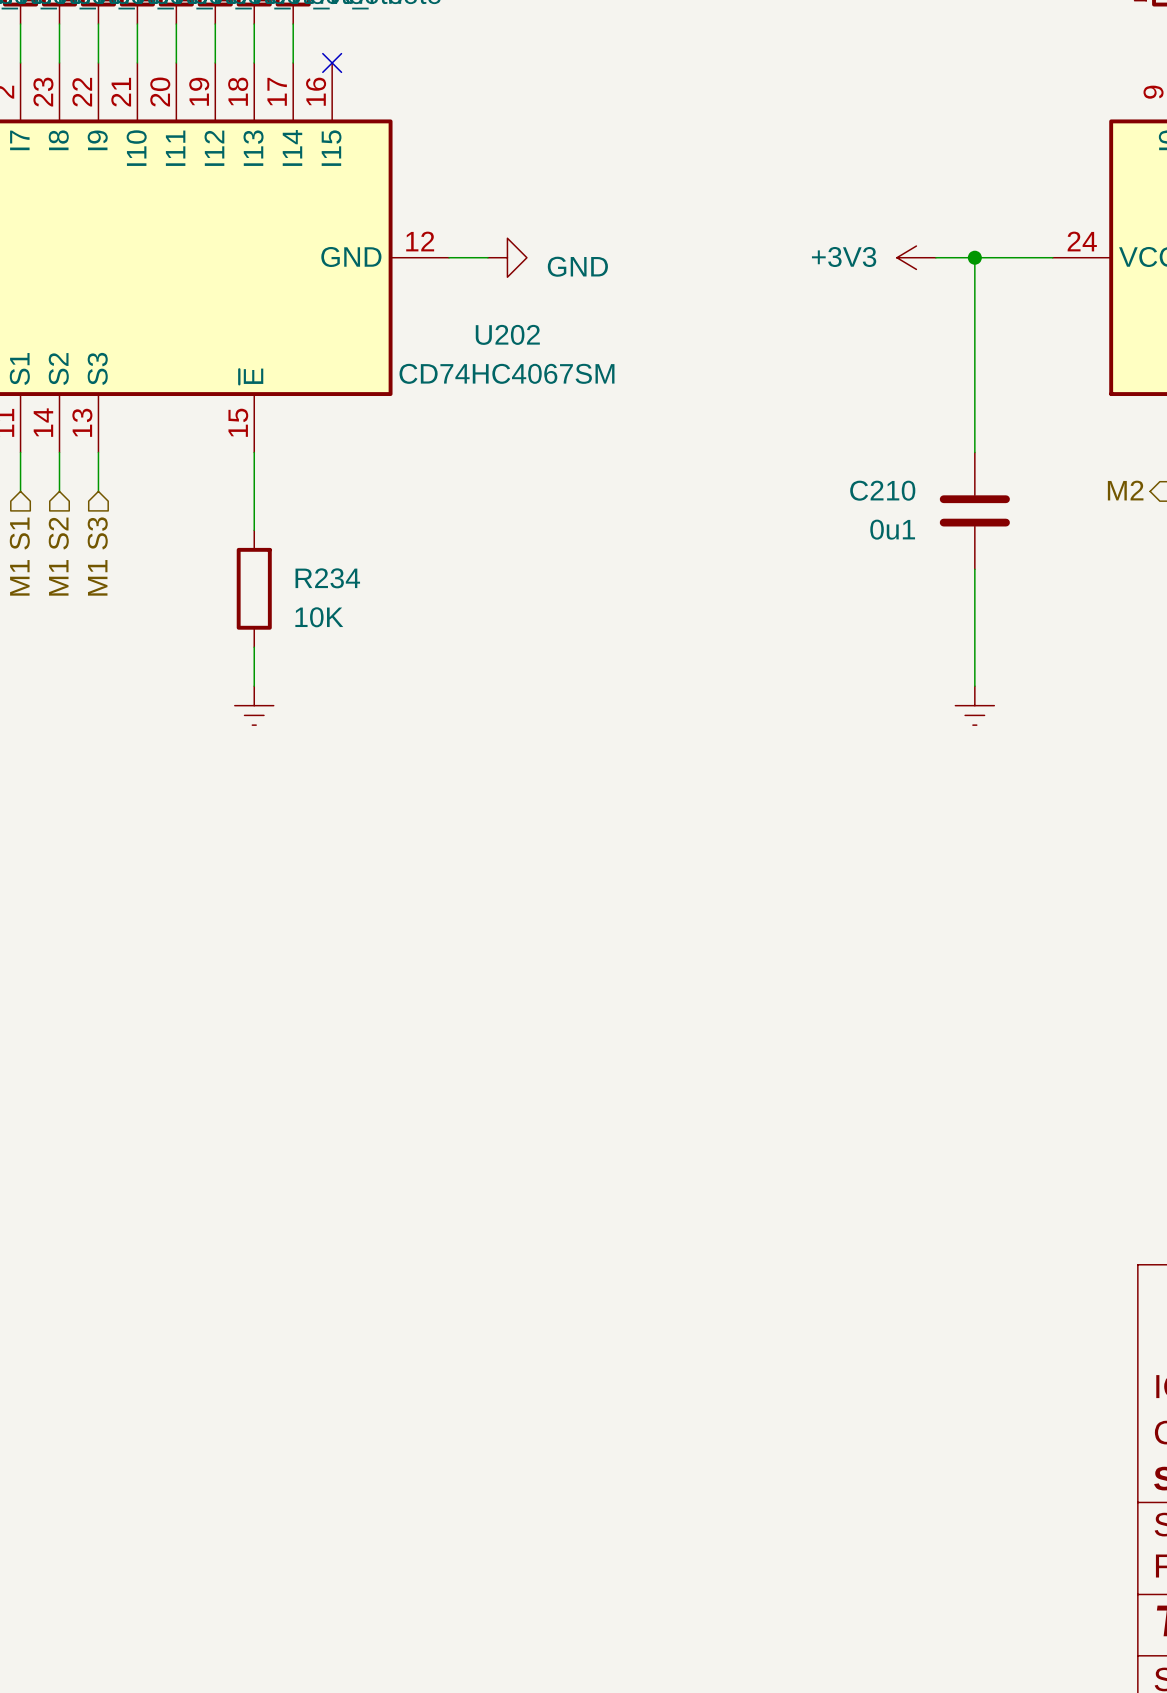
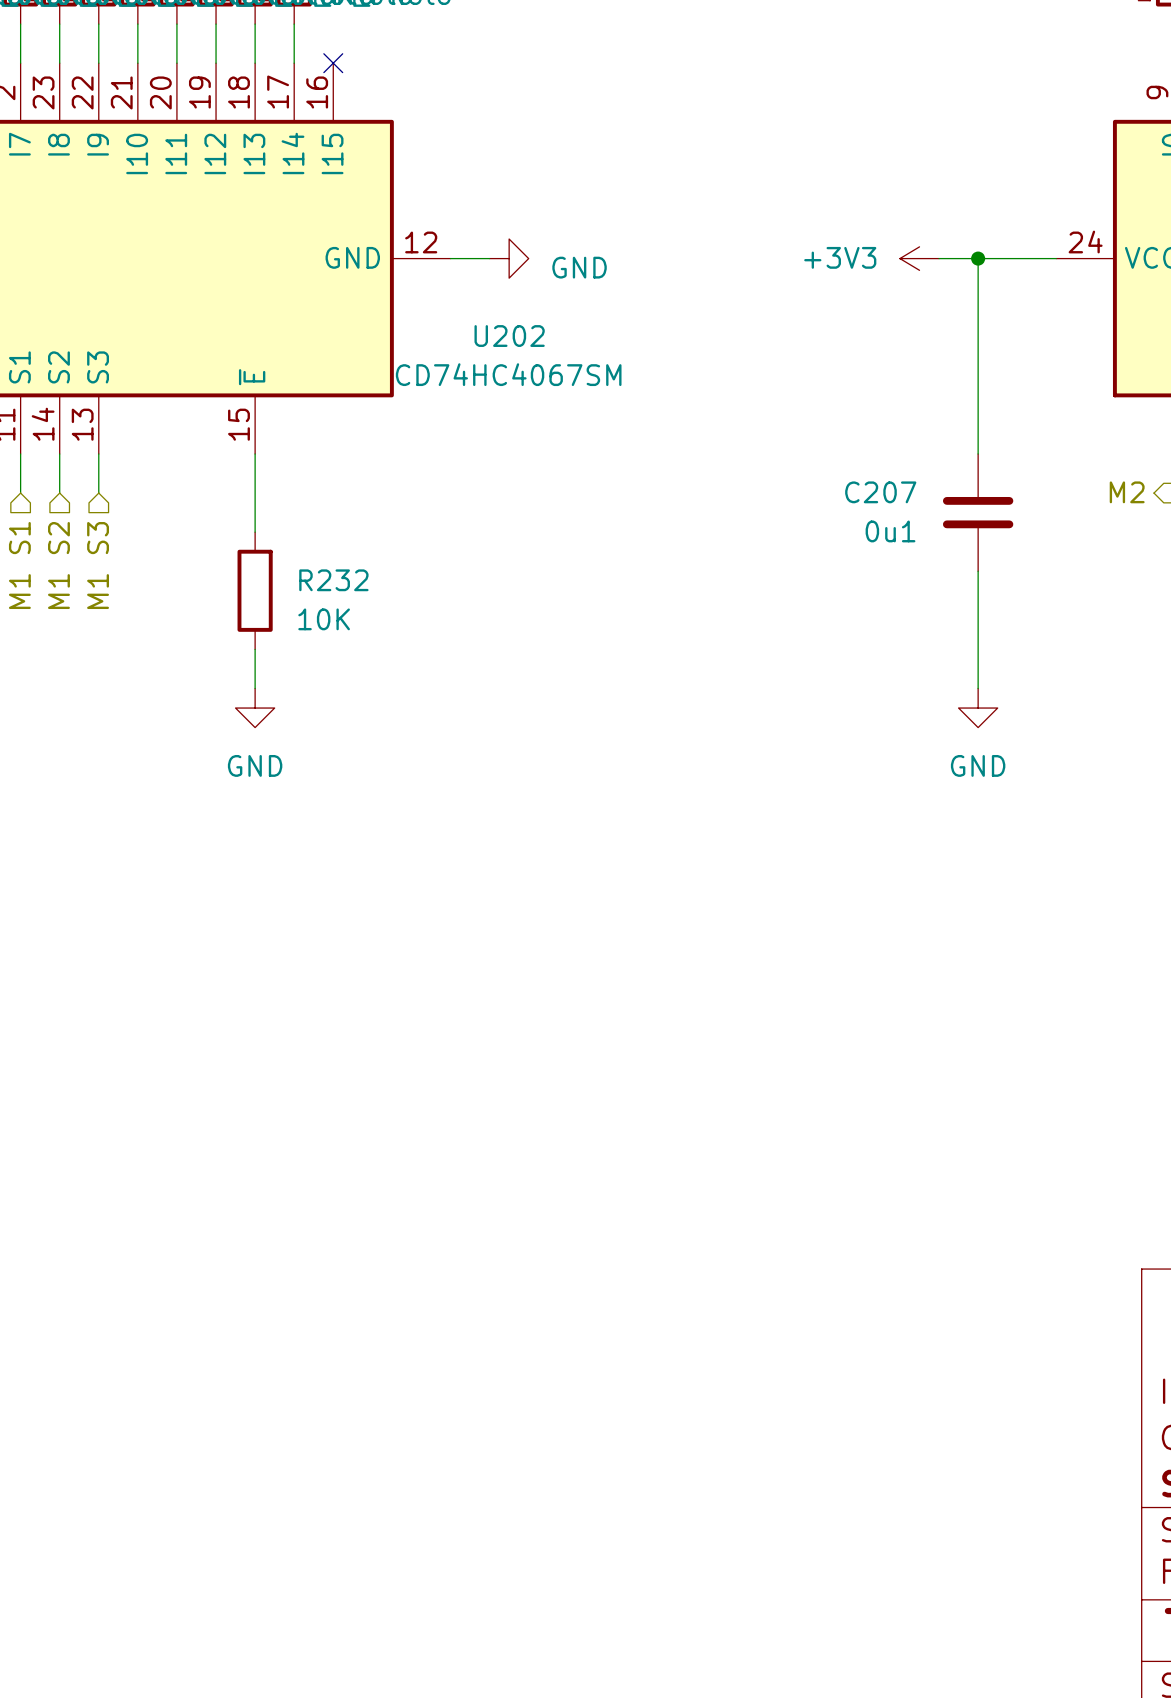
C210 name: C210 (882, 490) -> C207 (880, 492)
R234 name: R234 (327, 578) -> R232 (333, 580)
power symbol shape: [234, 686, 274, 726] -> [235, 688, 275, 728]
power symbol shape: [955, 686, 995, 726] -> [958, 688, 998, 728]
power symbol text: none -> GND (255, 765)
power symbol text: none -> GND (978, 765)

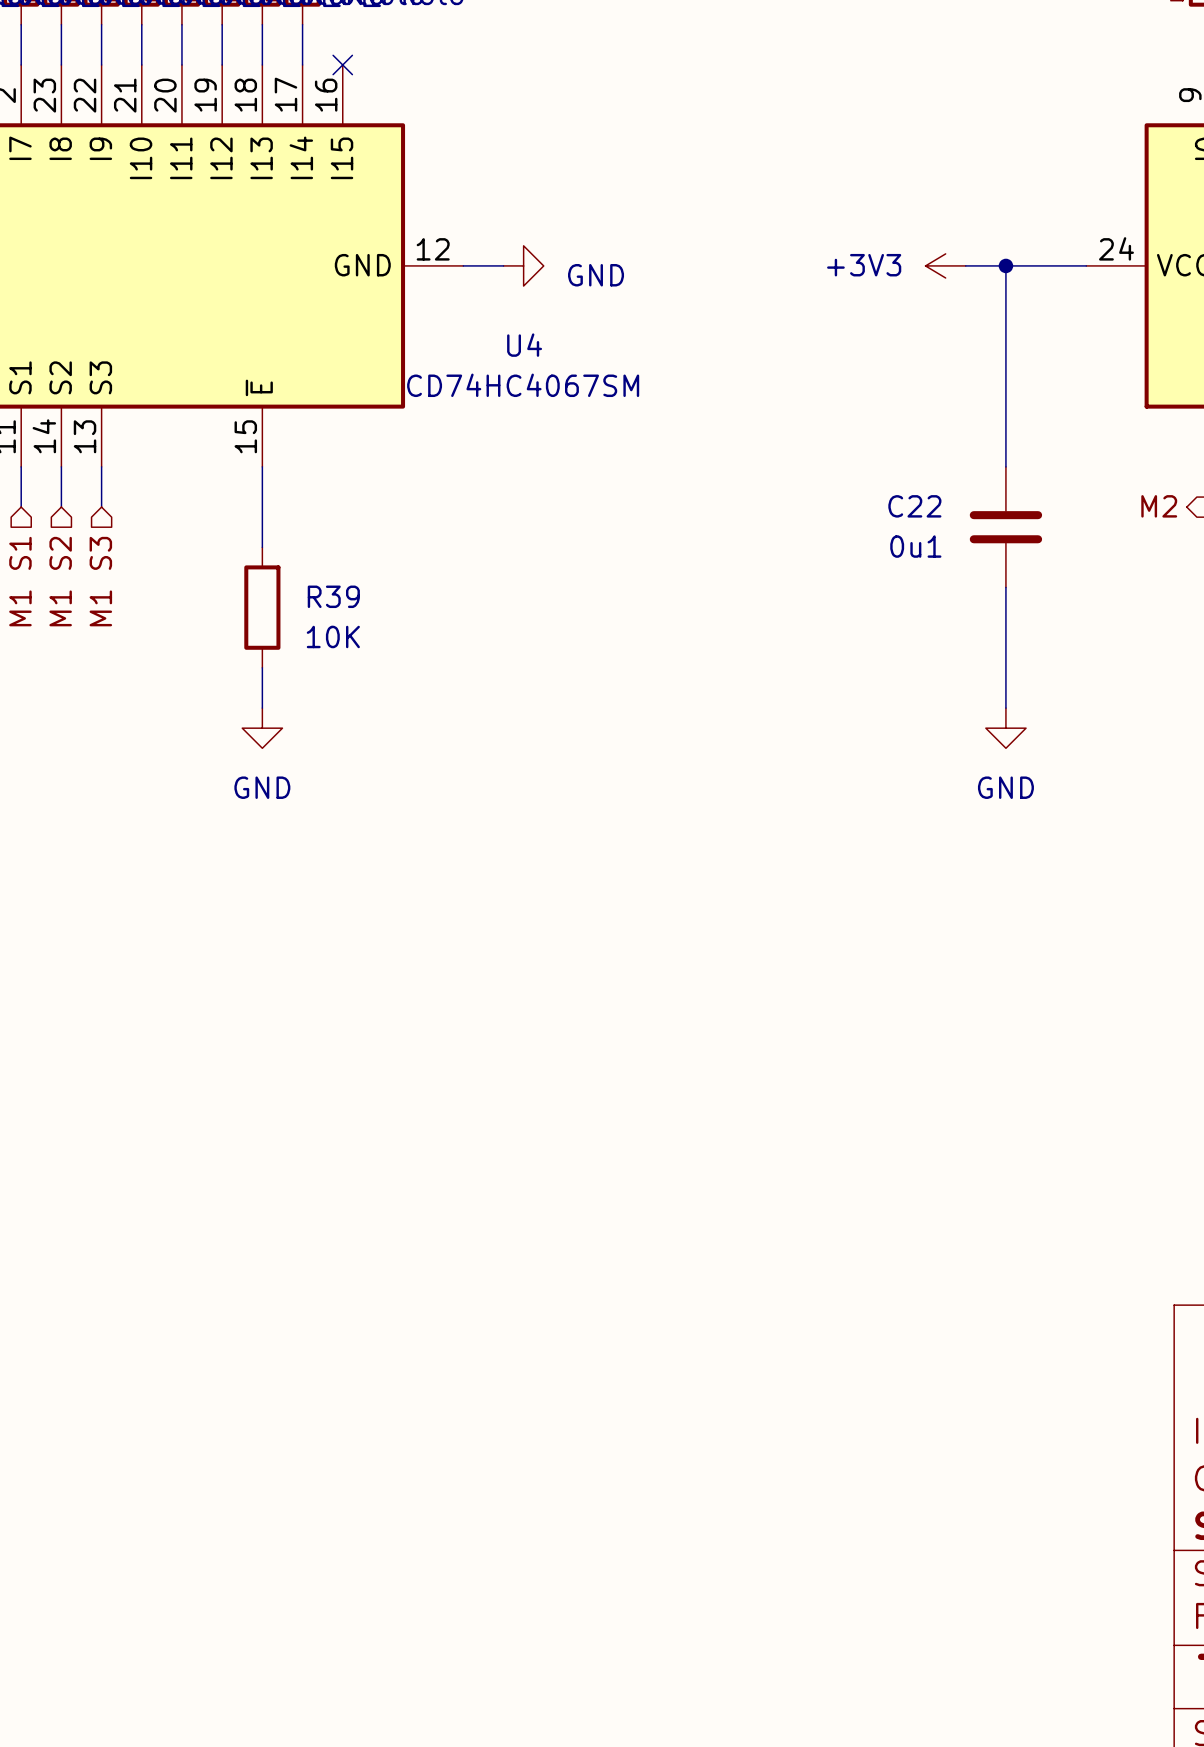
U202 name: U202 (509, 336) -> U4 (524, 345)
C207 name: C207 (880, 492) -> C22 (914, 506)
R232 name: R232 (333, 580) -> R39 (333, 596)

